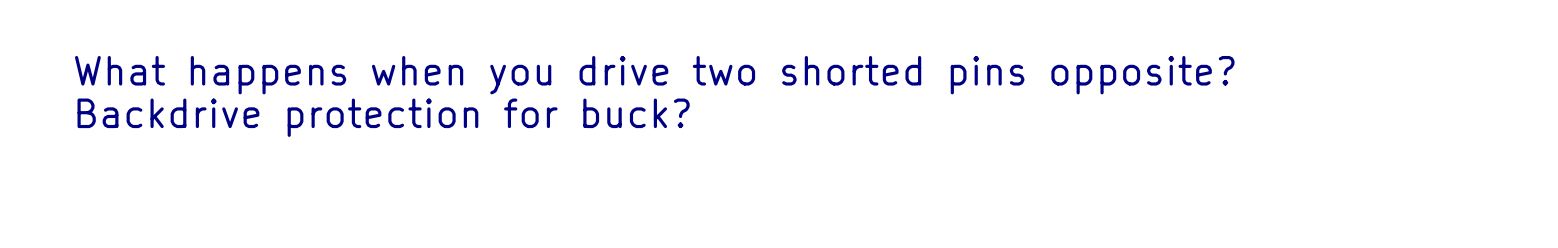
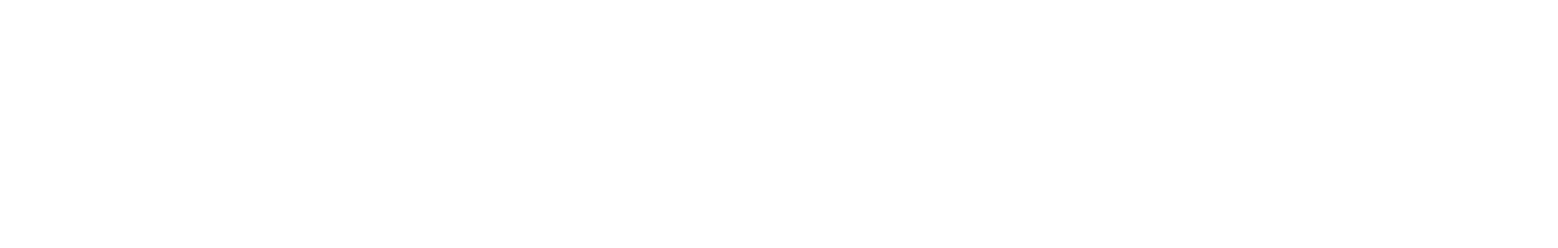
text: What happens when you drive two shorted pins opposite? (654, 75) -> none
text: Backdrive protection for buck? (383, 117) -> none

